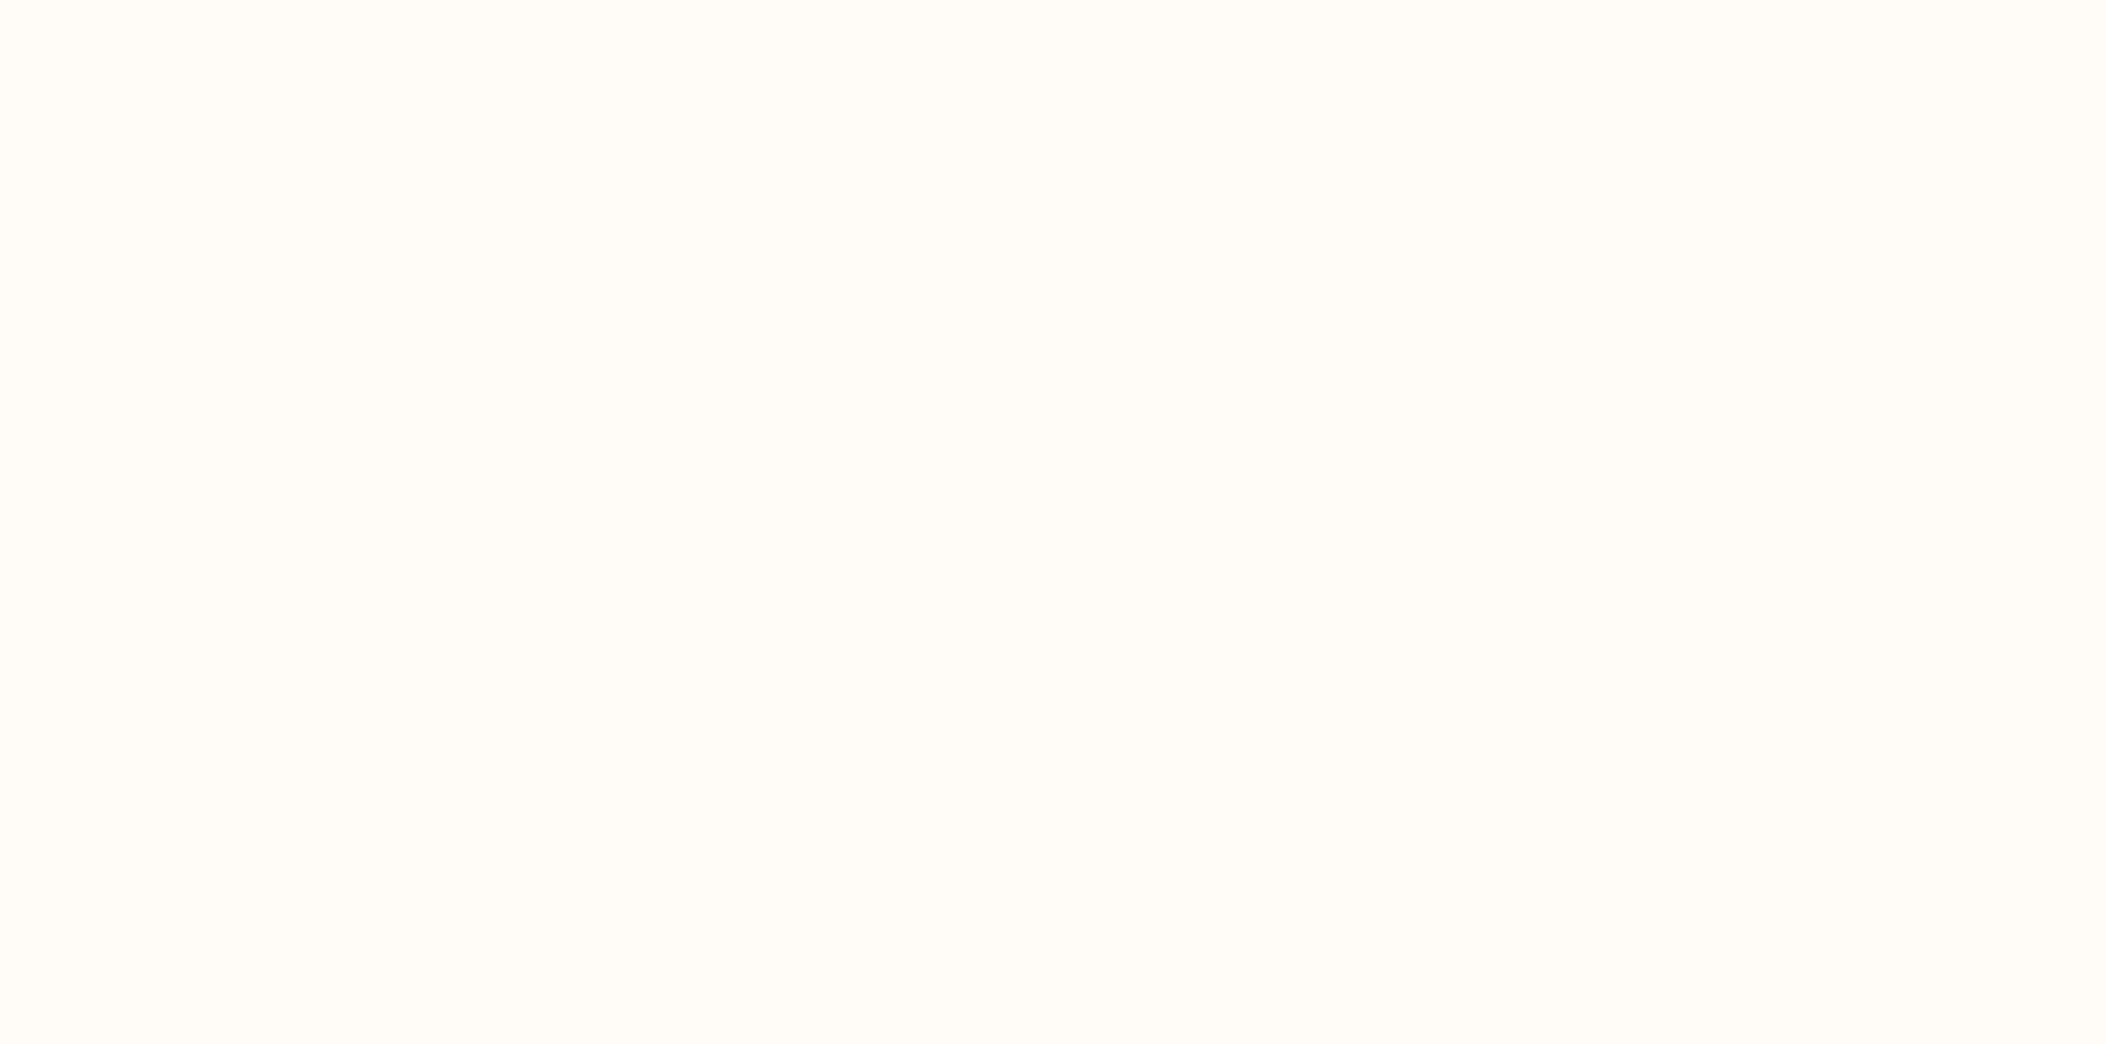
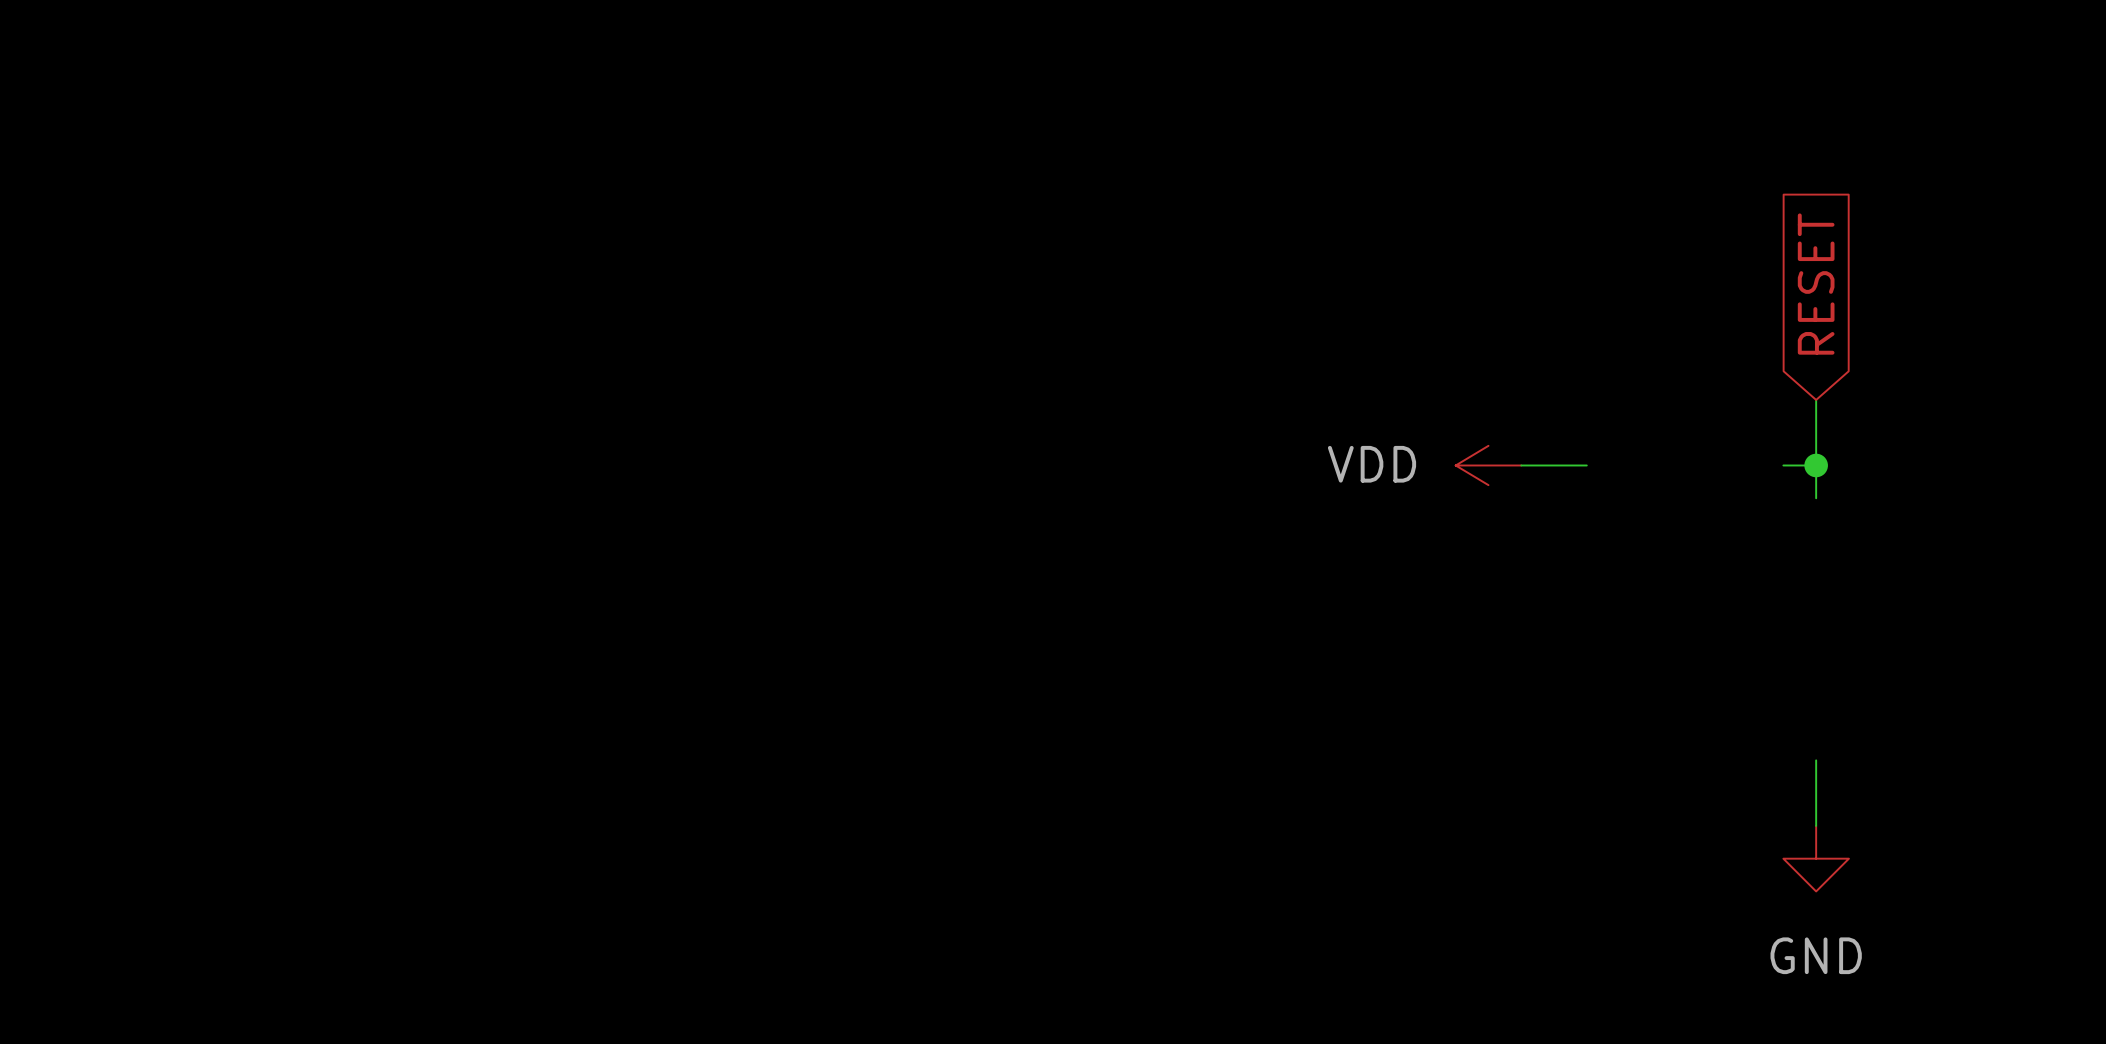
global label: none -> RESET (1816, 284)
wire: none -> (1816, 399) (1816, 498)
power symbol: none -> VDD (1488, 465)
wire: none -> (1521, 465) (1586, 465)
wire: none -> (1783, 465) (1816, 465)
junction: none -> (1816, 465)
wire: none -> (1816, 760) (1816, 825)
power symbol: none -> GND (1816, 858)

